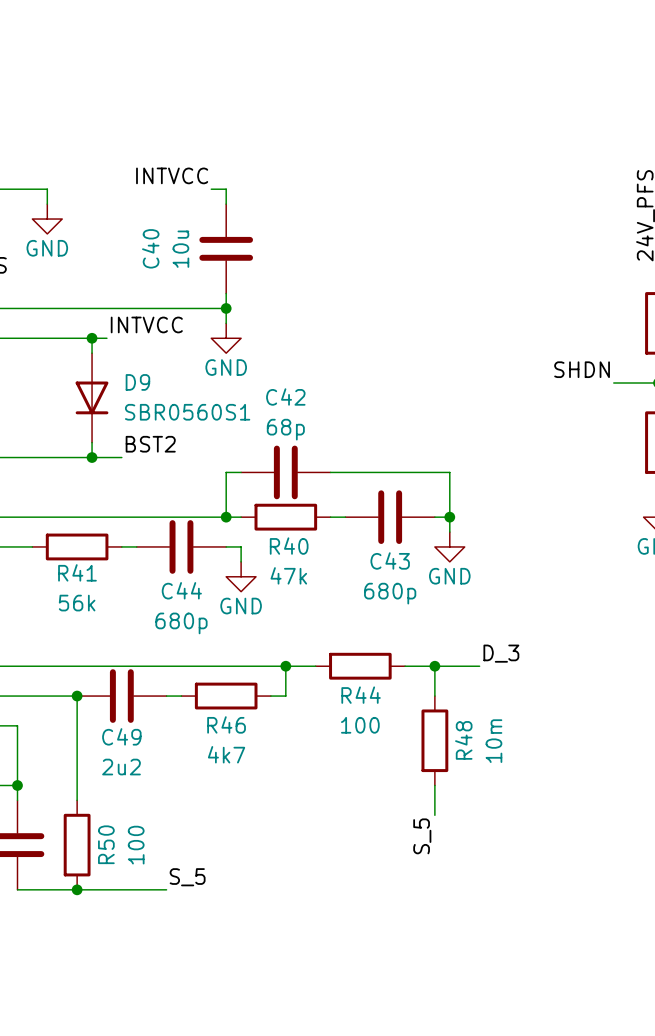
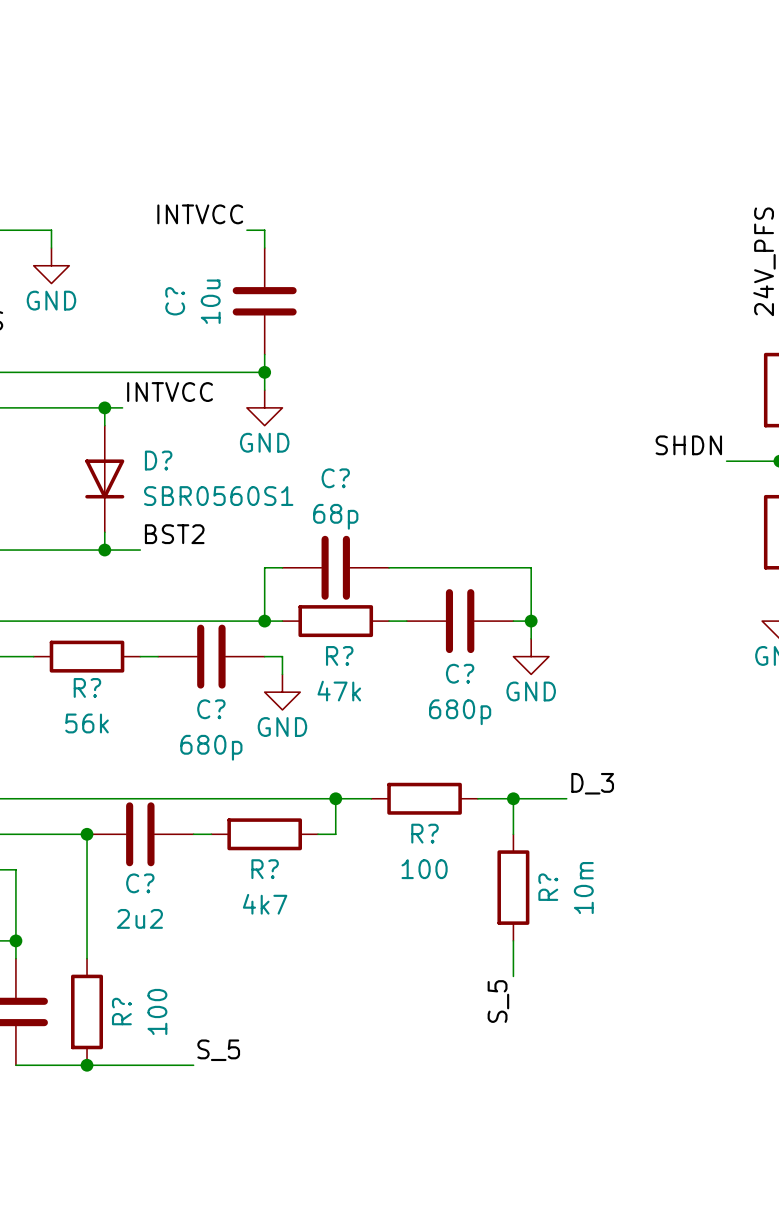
C40 name: C40 (150, 248) -> C? (175, 301)
D9 name: D9 (137, 382) -> D? (158, 460)
C42 name: C42 (285, 396) -> C? (335, 478)
R40 name: R40 (289, 546) -> R? (339, 655)
C43 name: C43 (390, 560) -> C? (460, 673)
R41 name: R41 (77, 572) -> R? (87, 687)
C44 name: C44 (181, 590) -> C? (211, 709)
R44 name: R44 (361, 695) -> R? (425, 833)
R46 name: R46 (226, 724) -> R? (265, 869)
C49 name: C49 (121, 736) -> C? (140, 883)
R48 name: R48 (463, 740) -> R? (548, 887)
R50 name: R50 (106, 844) -> R? (121, 1011)

